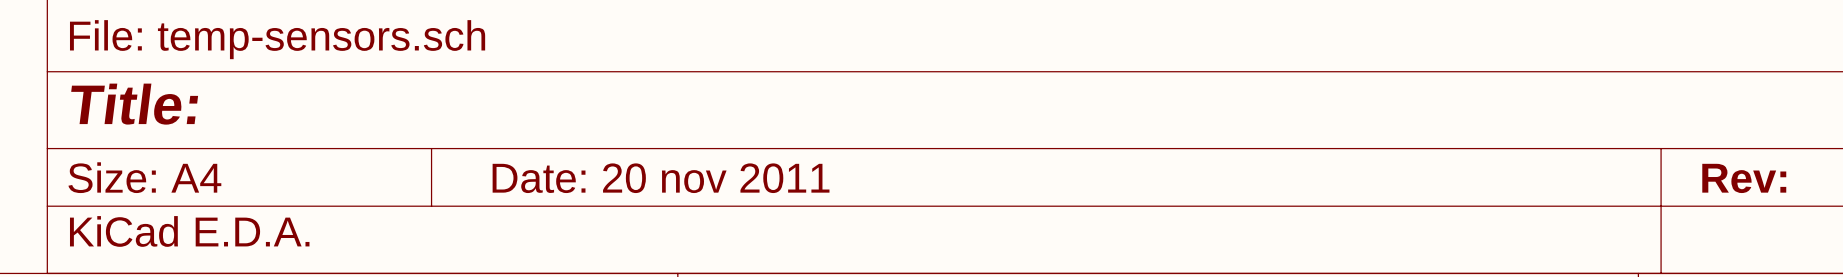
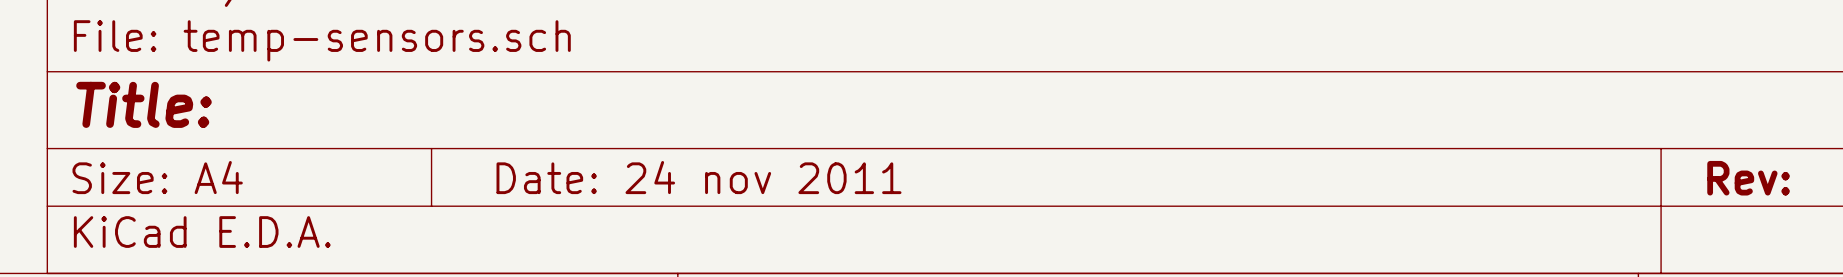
title block: Date: 20 nov 2011 (661, 178) -> Date: 24 nov 2011 (699, 177)

